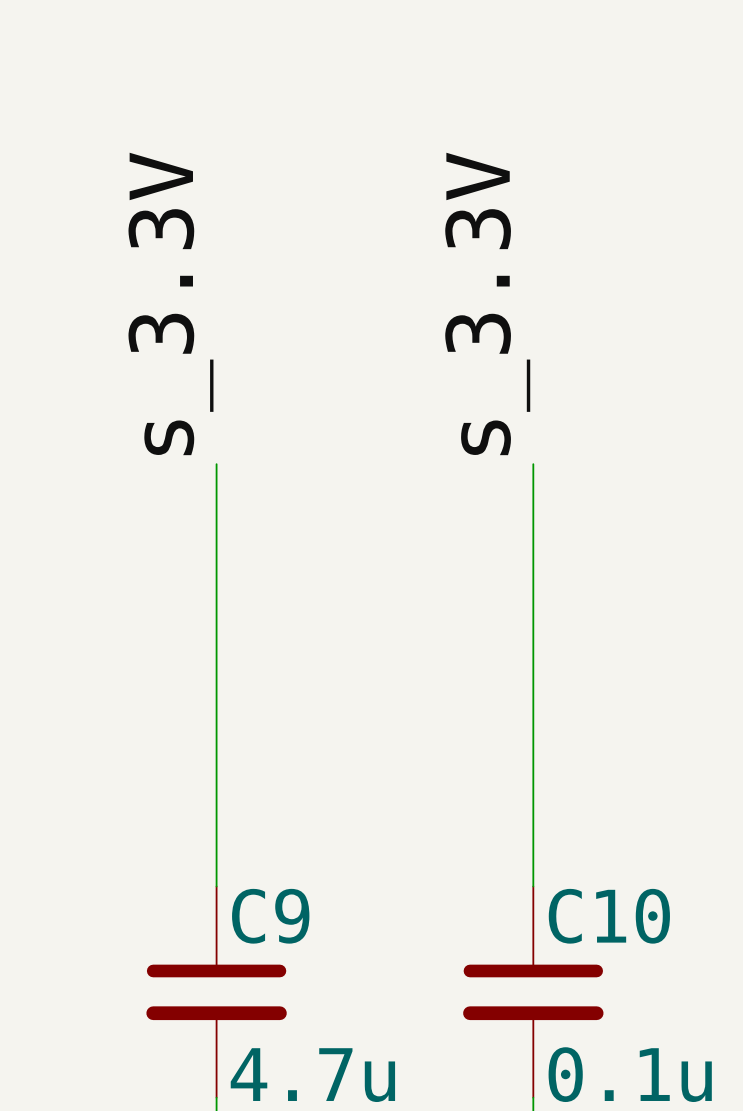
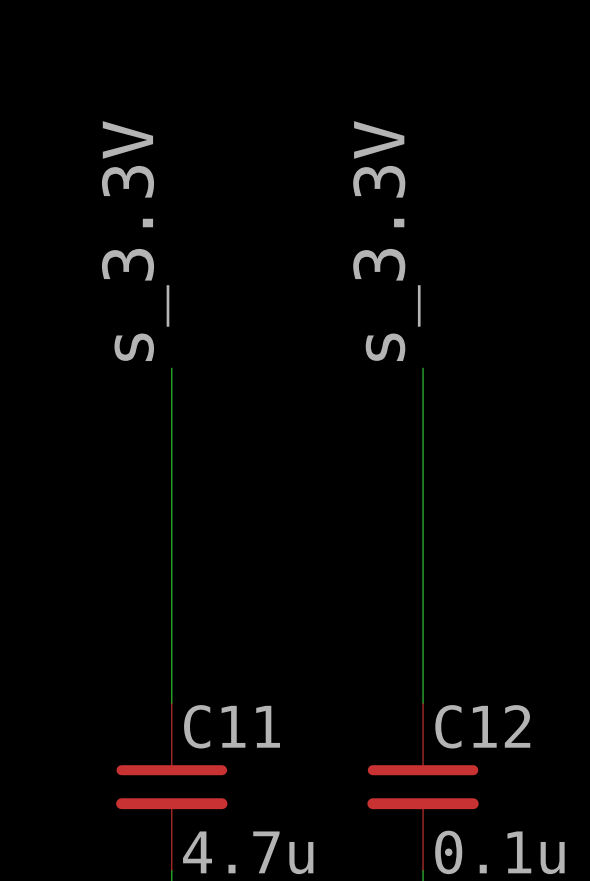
C9 name: C9 (270, 916) -> C11 (232, 726)
C10 name: C10 (609, 916) -> C12 (482, 726)

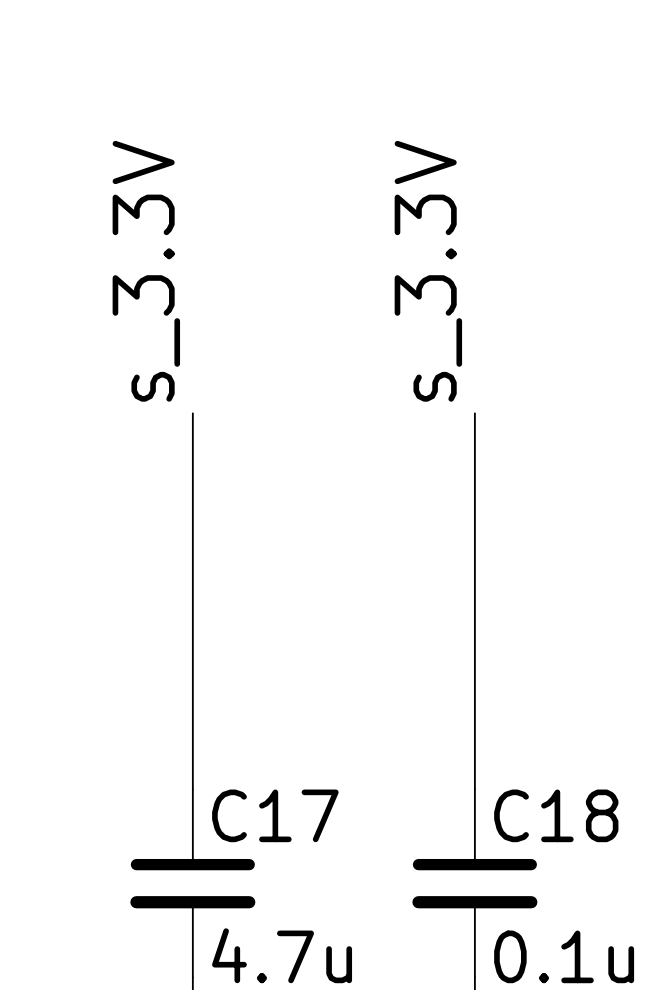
C11 name: C11 (232, 726) -> C17 (275, 815)
C12 name: C12 (482, 726) -> C18 (556, 815)

